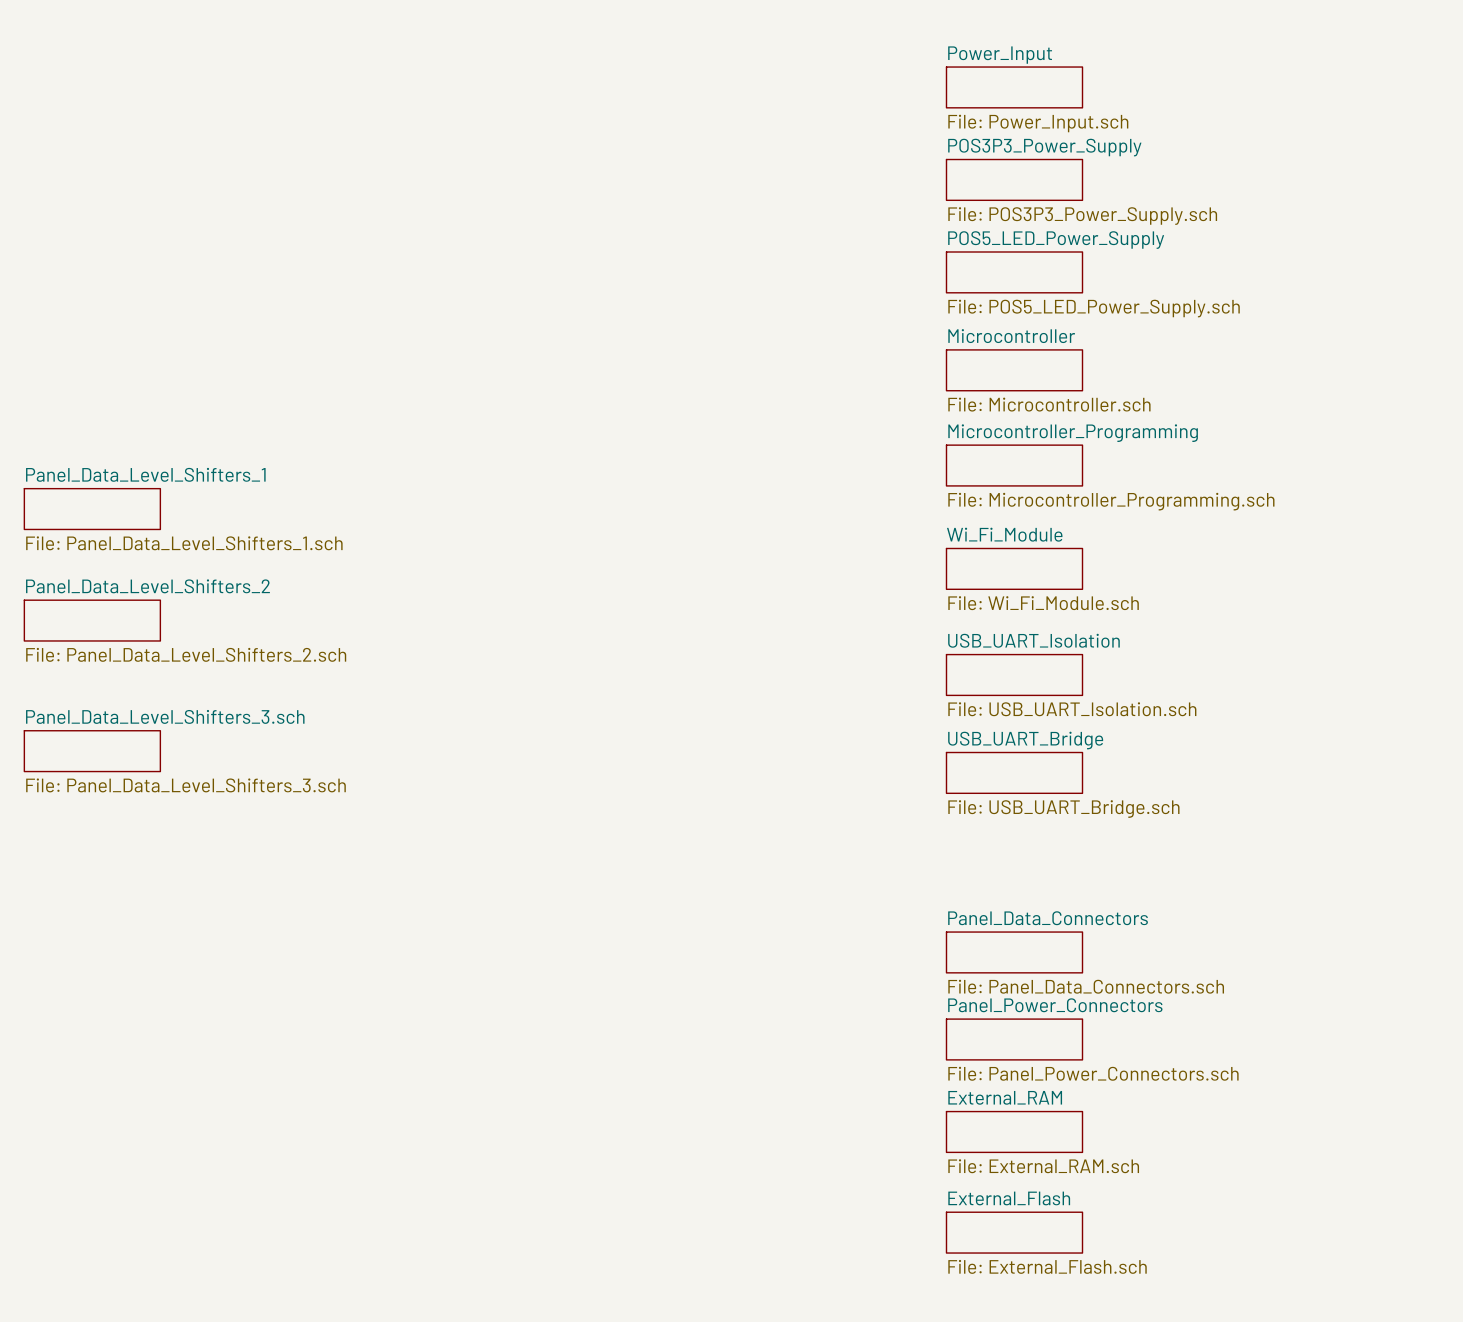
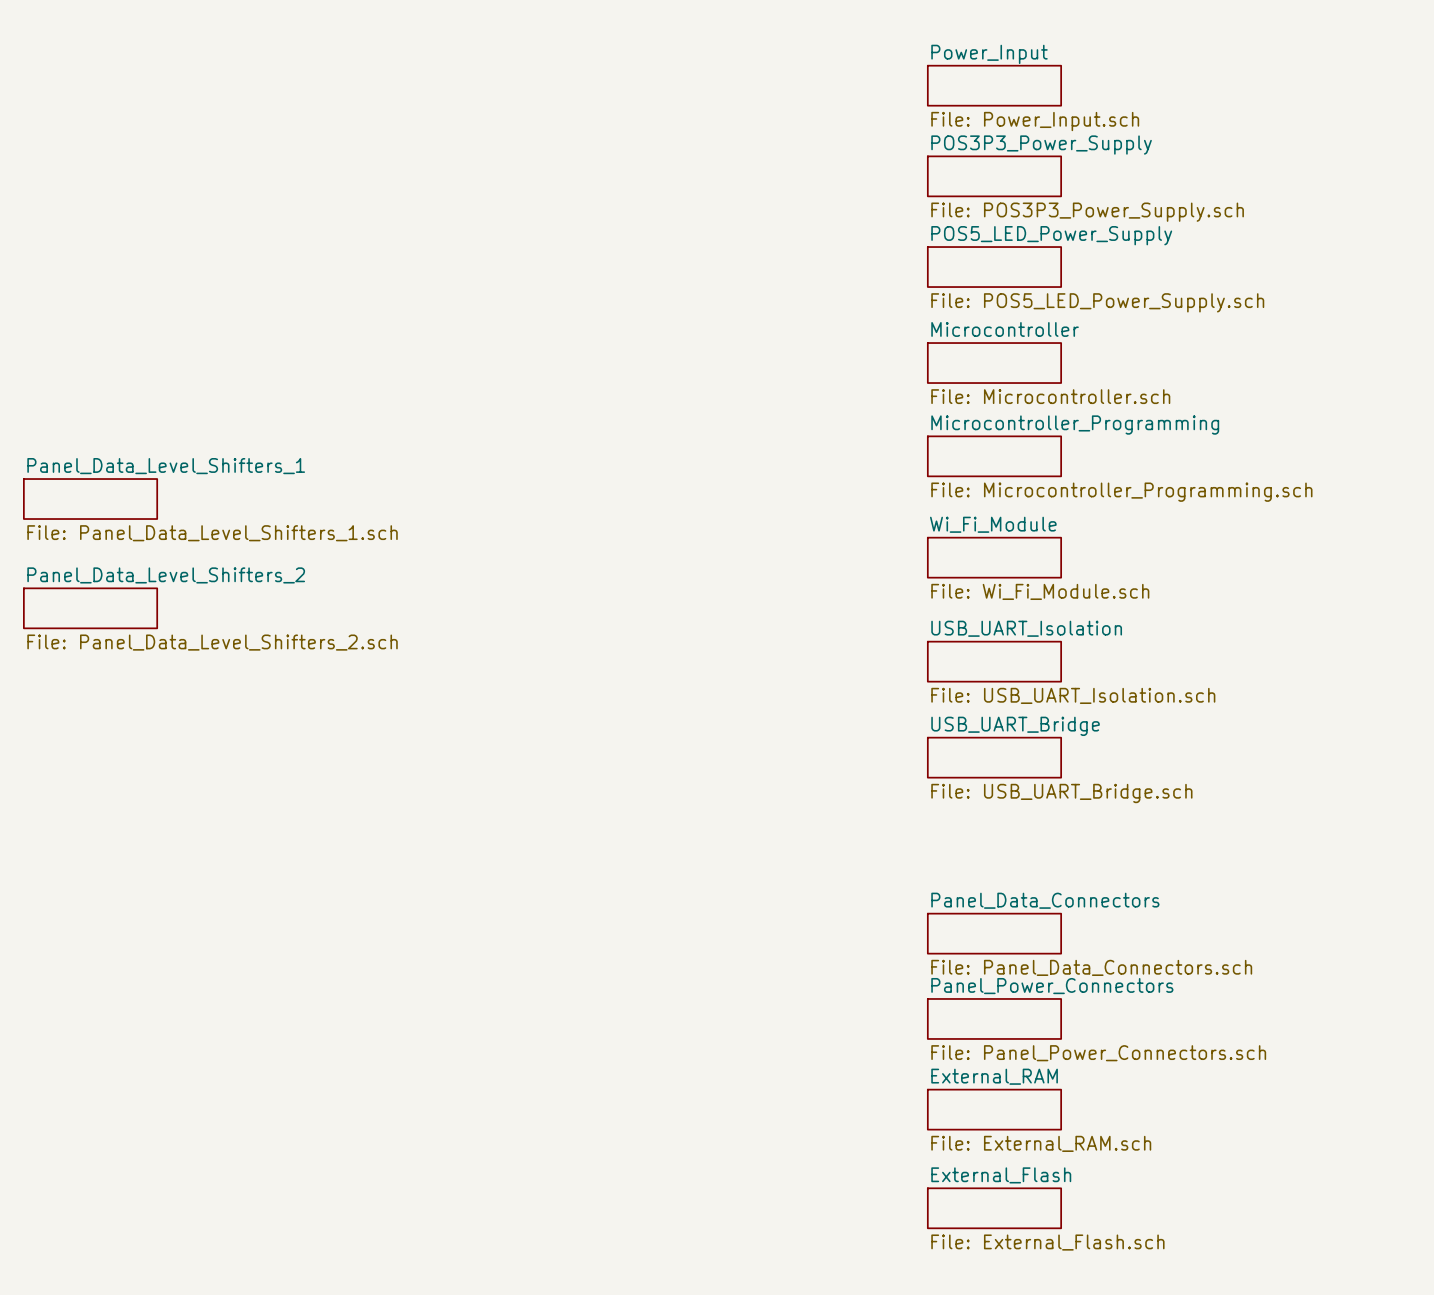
sheet Panel_Data_Level_Shifters_3.sch: File: Panel_Data_Level_Shifters_3.sch (92, 751) -> none

